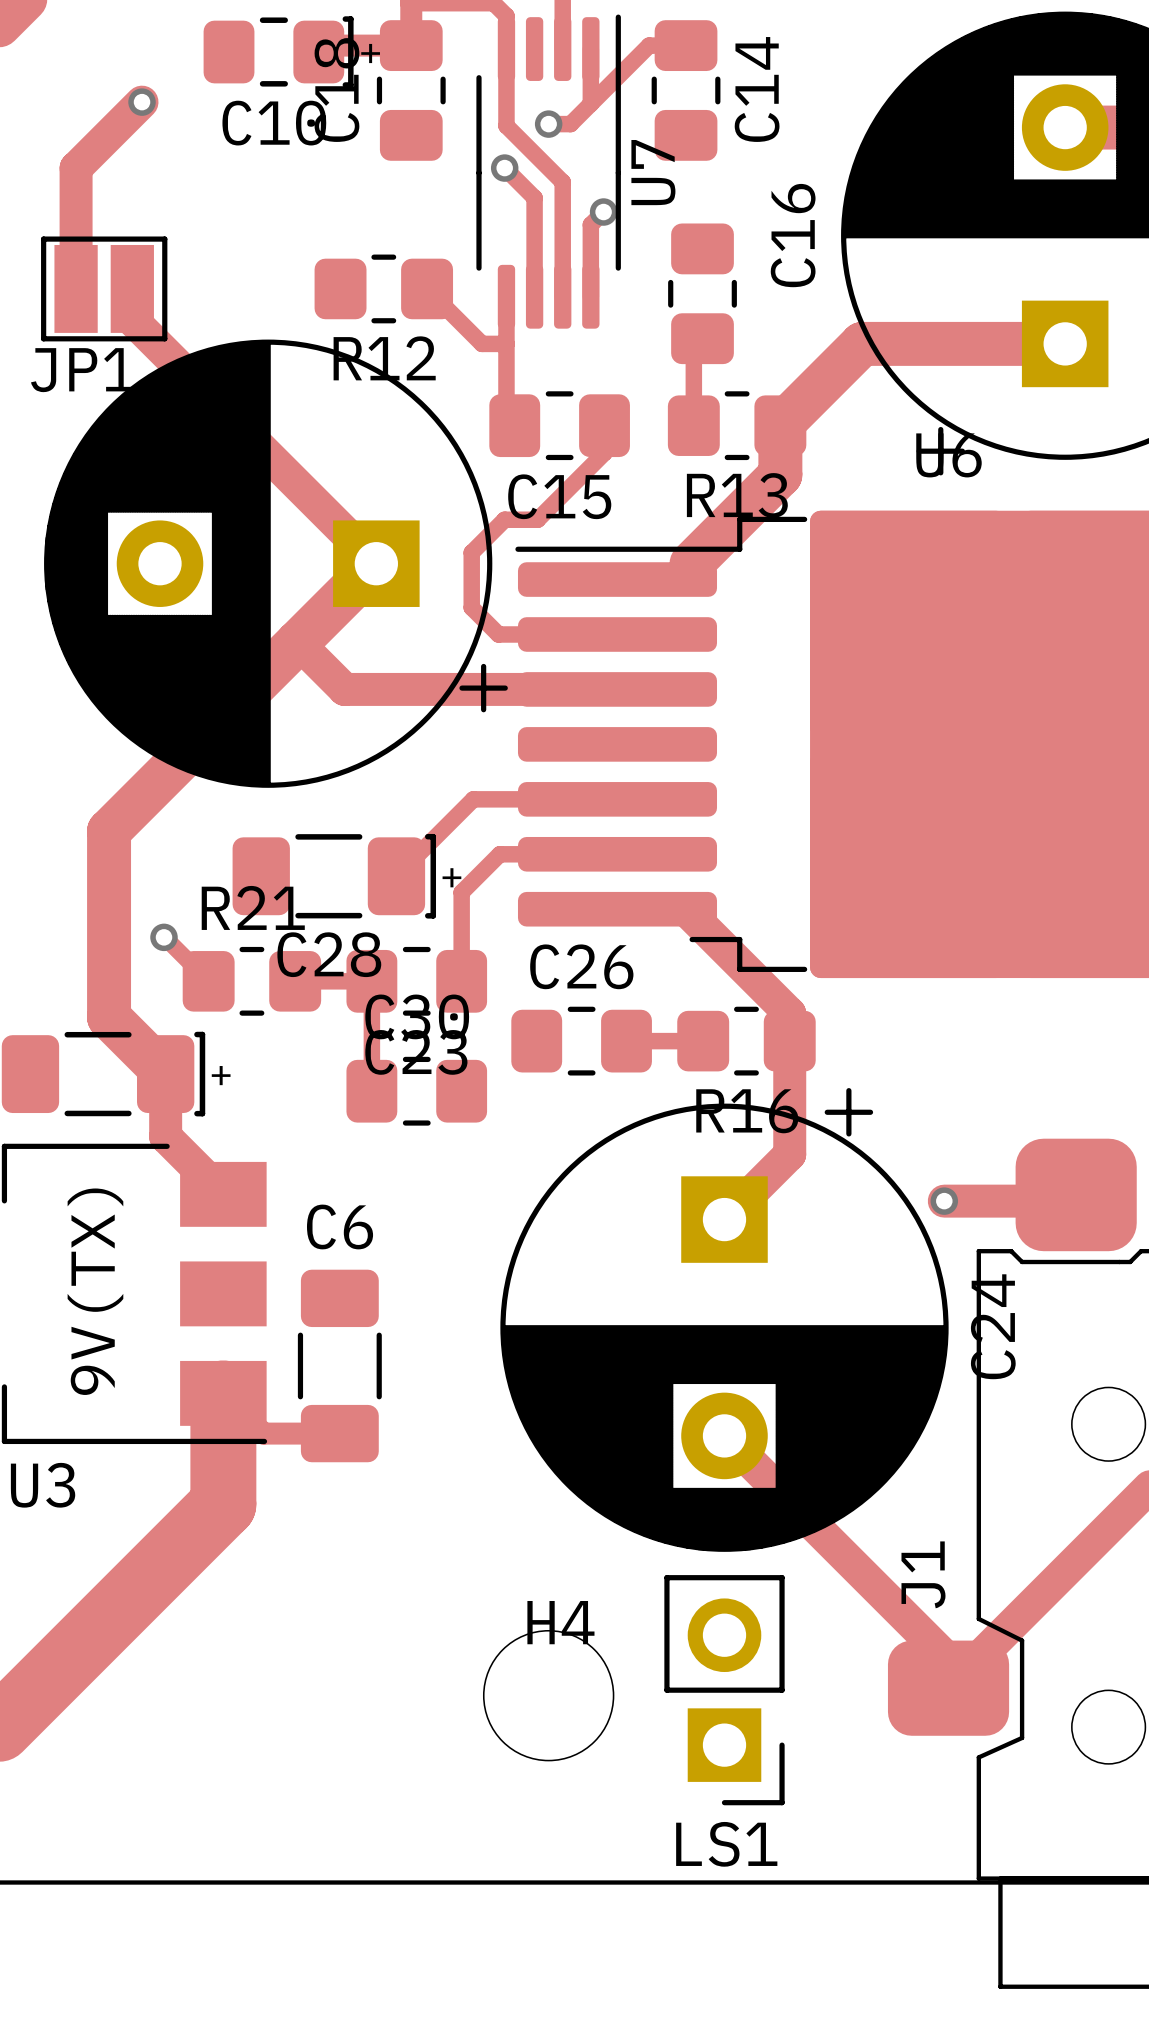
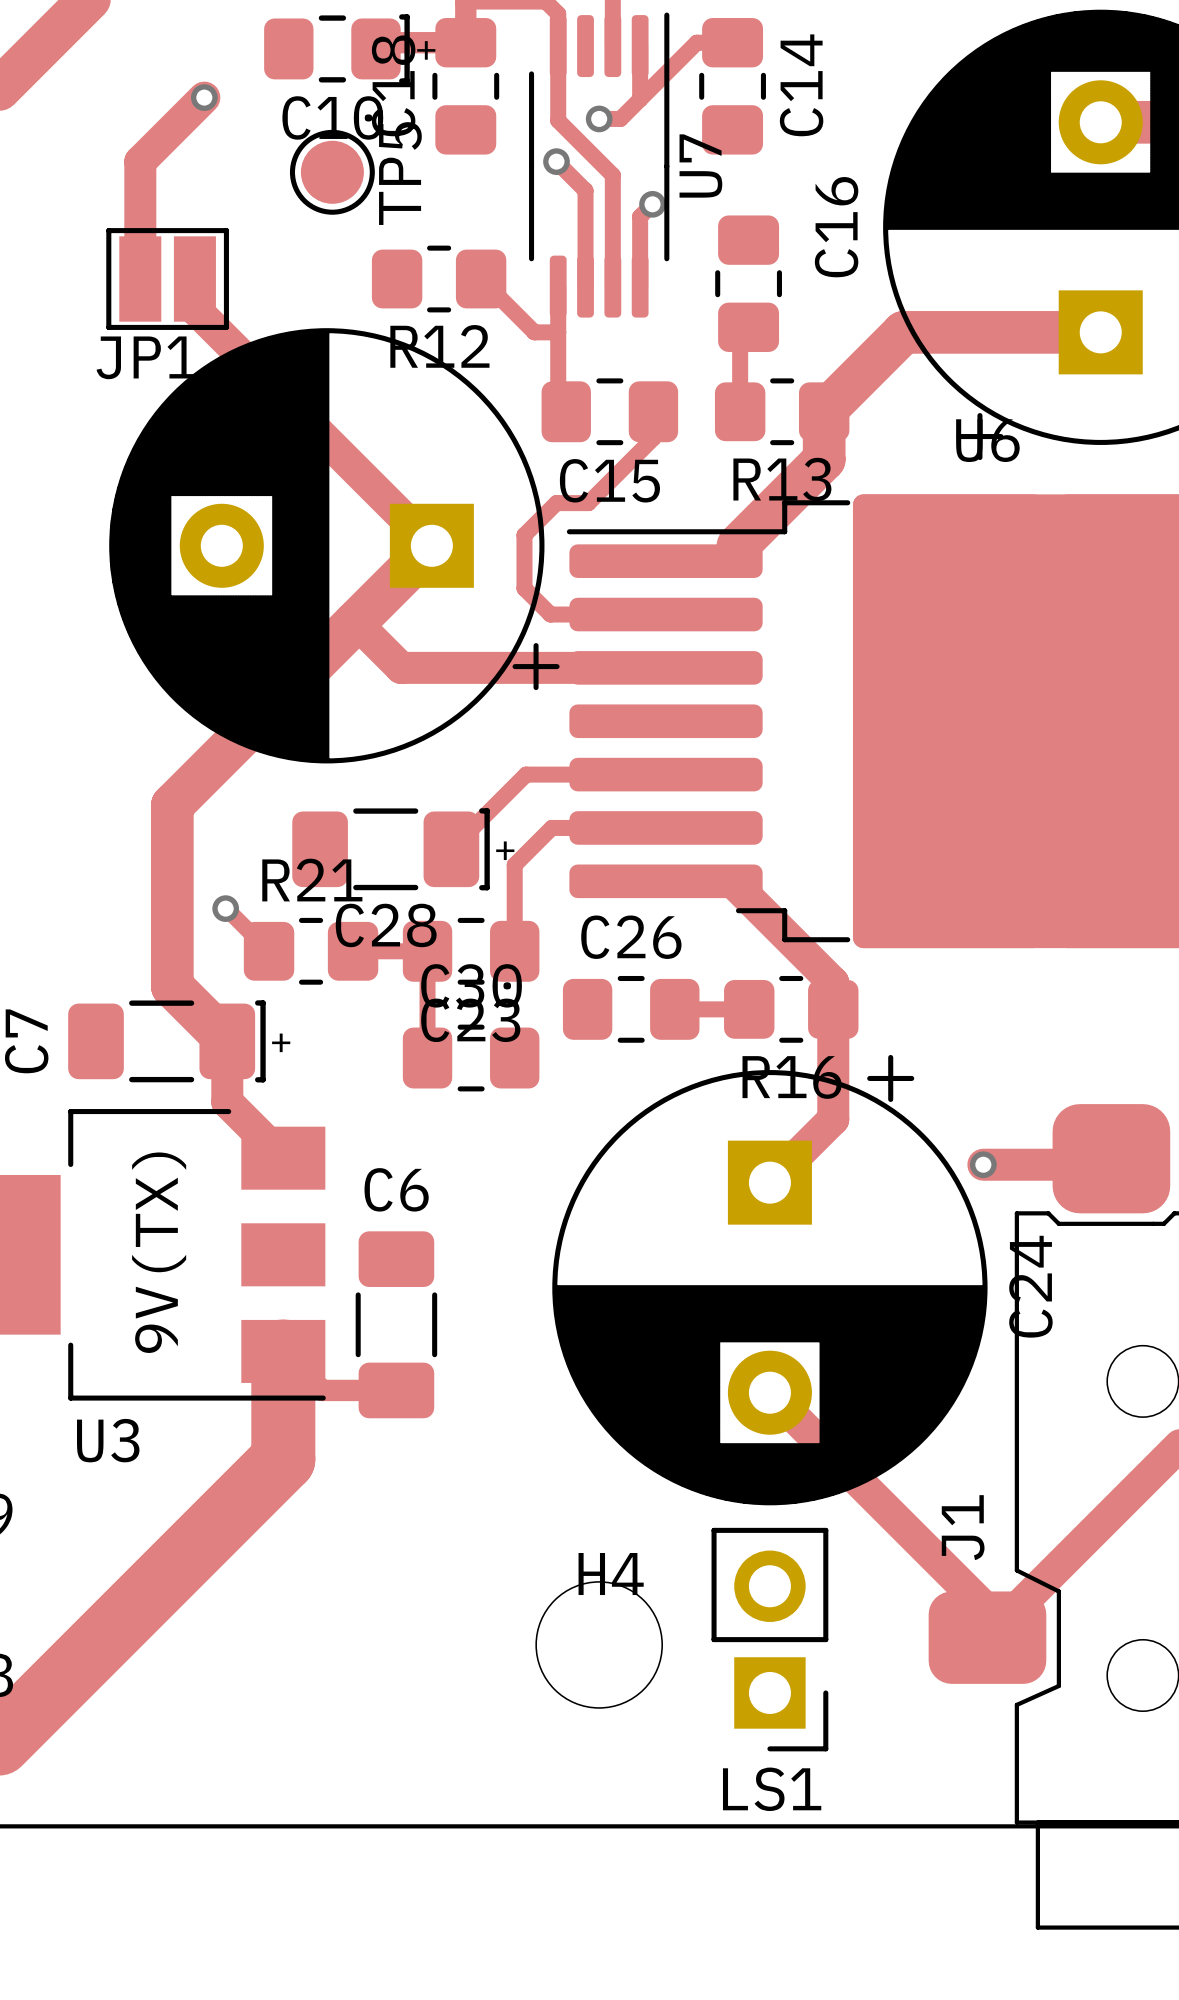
TP5: none -> (332, 172)

